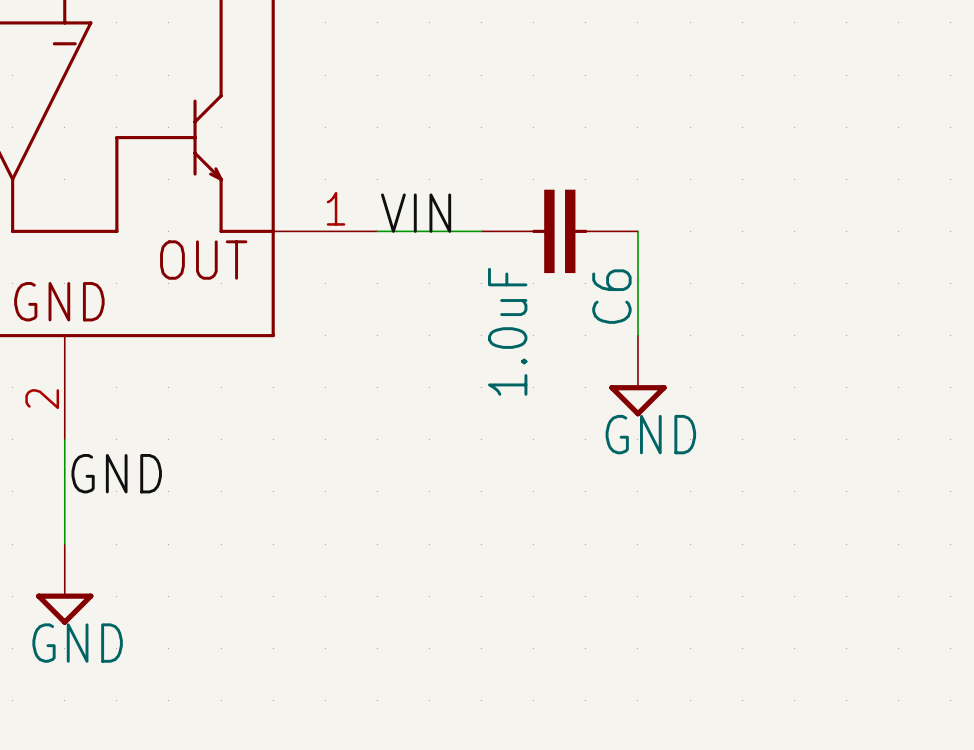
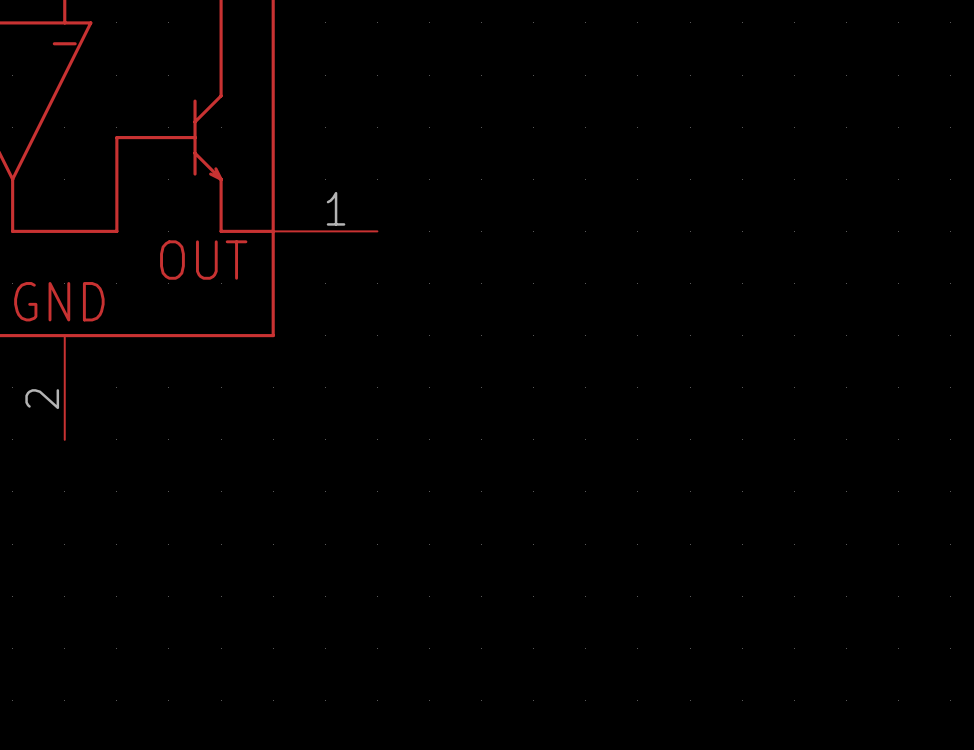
label: VIN (416, 213) -> none
wire: (377, 231) (481, 231) -> none
C6: 1.0uF (559, 231) -> none
wire: (637, 231) (637, 335) -> none
power symbol: GND (637, 375) -> none
wire: (64, 439) (64, 544) -> none
label: GND (116, 473) -> none
power symbol: GND (64, 584) -> none

